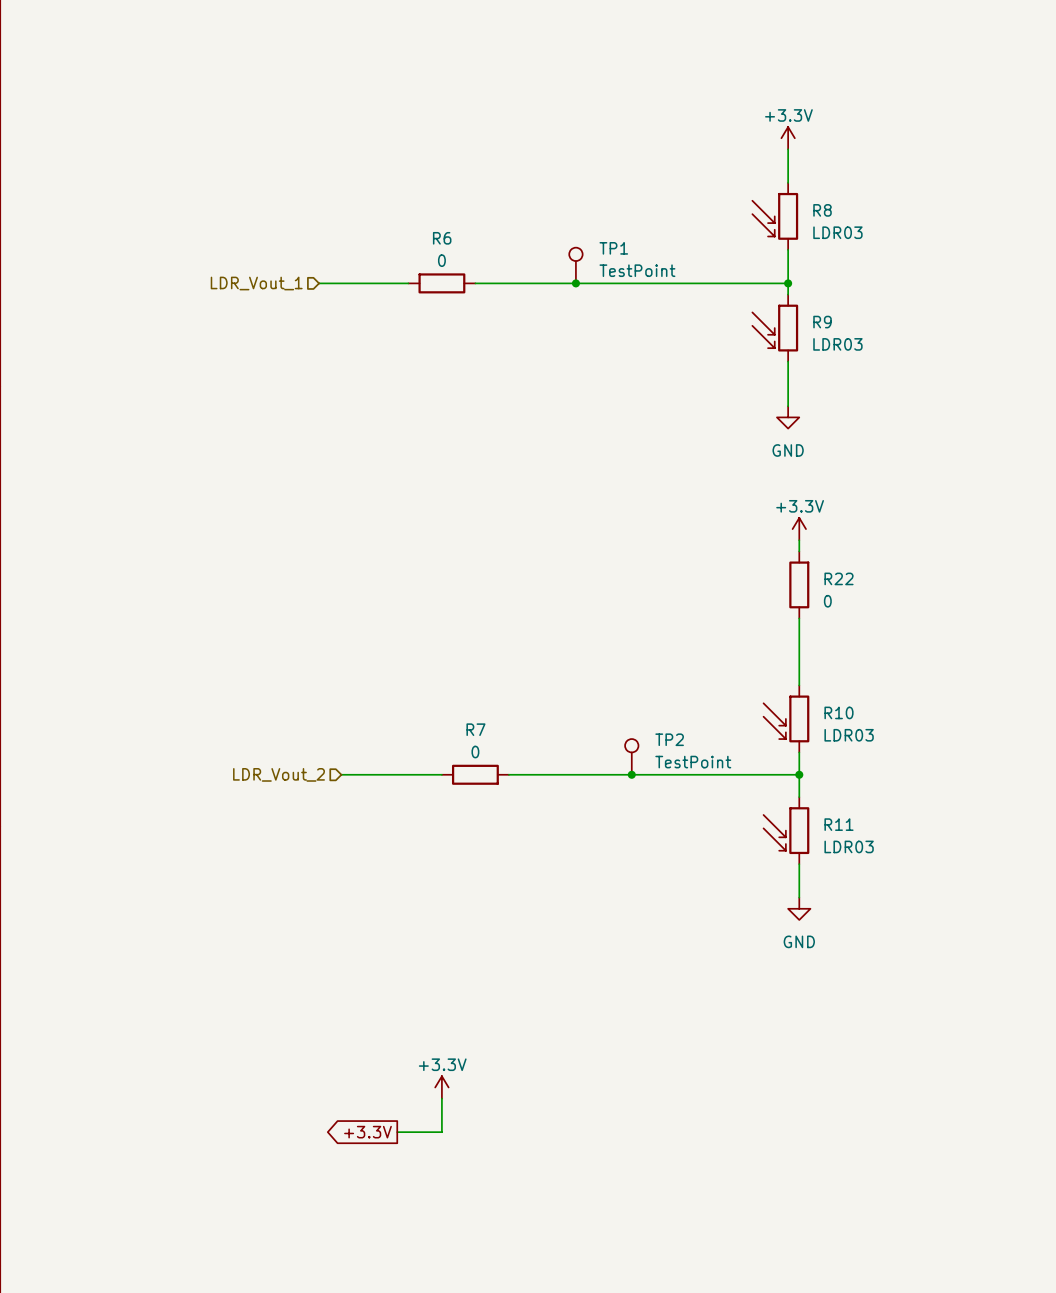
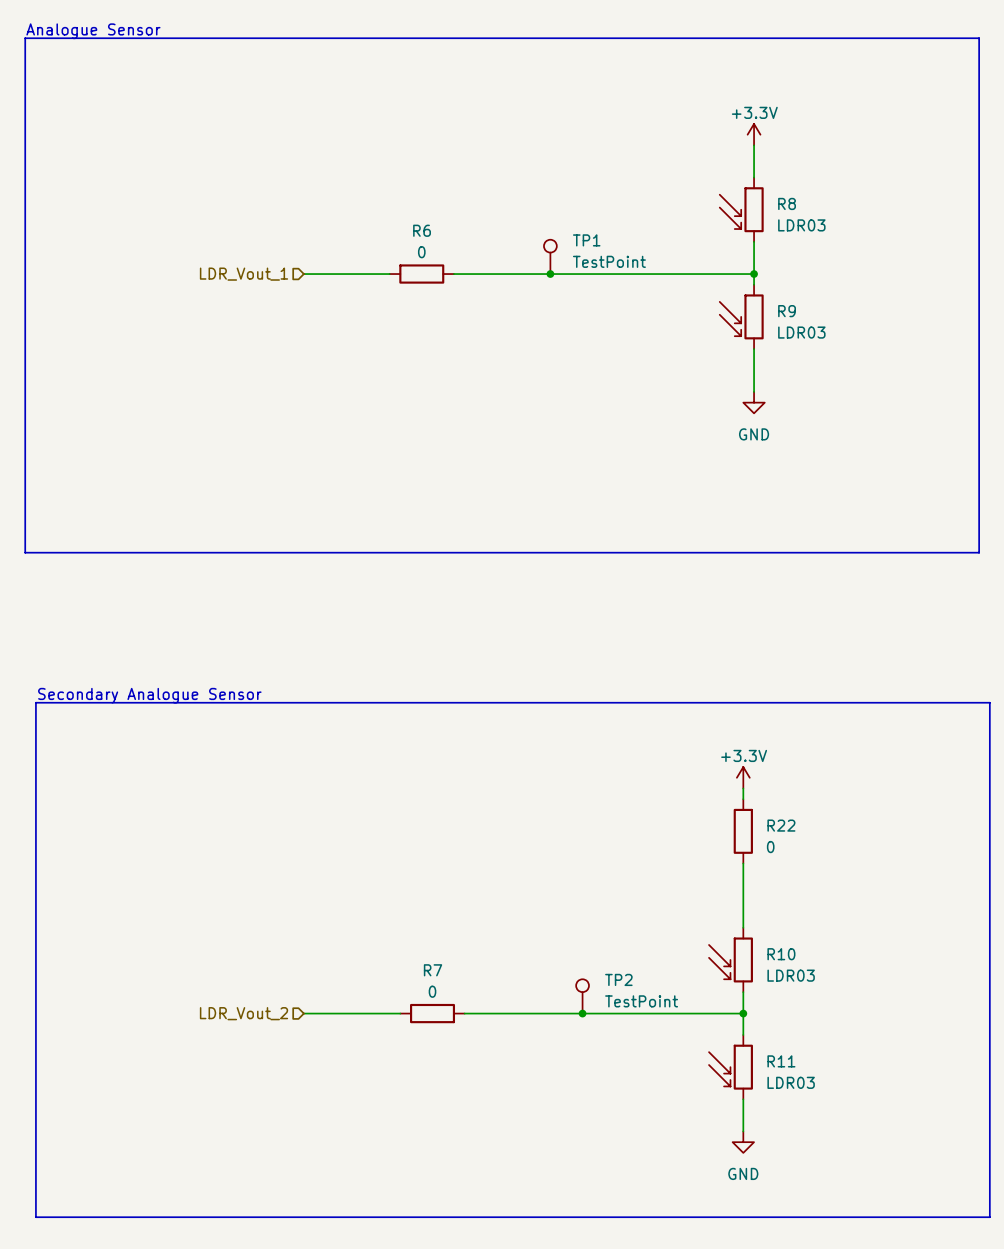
text: none -> Analogue Sensor (93, 31)
line: none -> (25, 38) (979, 38) (979, 552) (25, 552) (25, 38)
power symbol: +3.3V (799, 529) -> none
wire: (799, 540) (799, 551) -> none
R22 position: (799, 584) -> (743, 831)
wire: (799, 618) (799, 685) -> none
R10 position: (786, 718) -> (731, 959)
text: none -> Secondary Analogue Sensor (149, 695)
line: none -> (35, 702) (989, 702) (989, 1217) (35, 1217) (35, 702)
wire: (799, 752) (799, 797) -> none
TP2 position: (631, 756) -> (582, 996)
hierarchical label: LDR_Vout_2 (279, 774) -> none
wire: (341, 774) (441, 774) -> none
R7 position: (475, 774) -> (432, 1013)
wire: (508, 774) (799, 774) -> none
junction: (631, 774) -> none
junction: (799, 774) -> none
power symbol: none -> +3.3V (743, 777)
wire: none -> (743, 788) (743, 799)
R11 position: (786, 830) -> (731, 1067)
wire: (799, 864) (799, 897) -> none
wire: none -> (743, 863) (743, 927)
power symbol: GND (799, 908) -> none
wire: none -> (743, 992) (743, 1035)
wire: none -> (303, 1013) (400, 1013)
wire: none -> (464, 1013) (743, 1013)
junction: none -> (582, 1013)
junction: none -> (743, 1013)
hierarchical label: none -> LDR_Vout_2 (244, 1013)
power symbol: +3.3V (441, 1087) -> none
wire: (441, 1098) (441, 1132) (397, 1132) -> none
global label: +3.3V (367, 1132) -> none
wire: none -> (743, 1099) (743, 1131)
power symbol: none -> GND (743, 1142)

